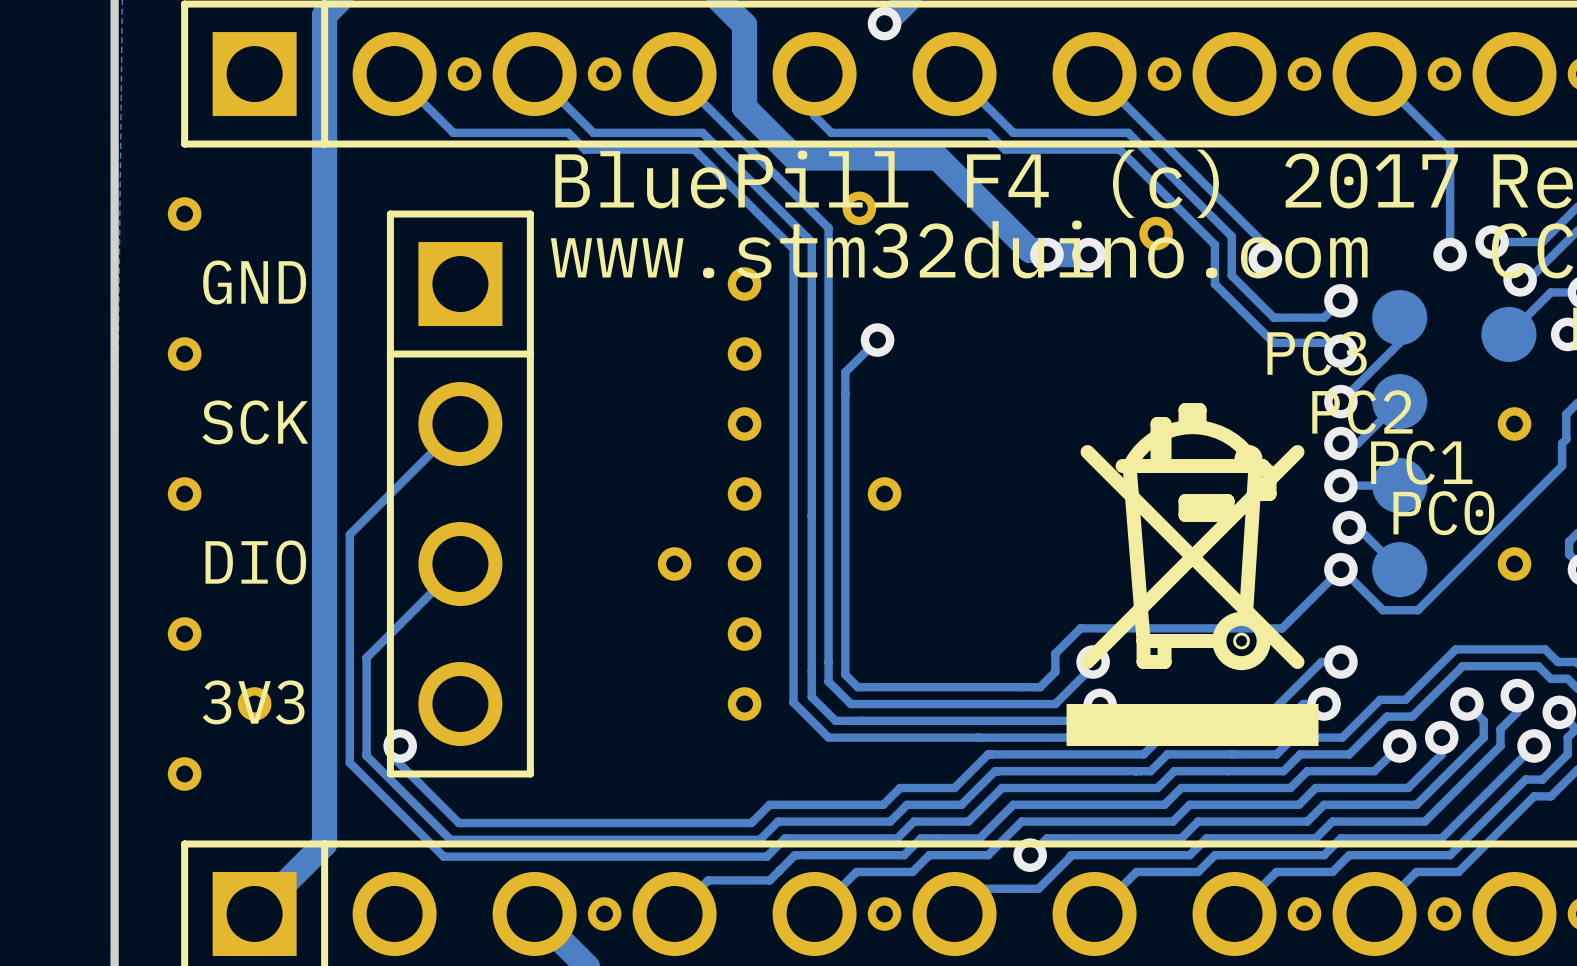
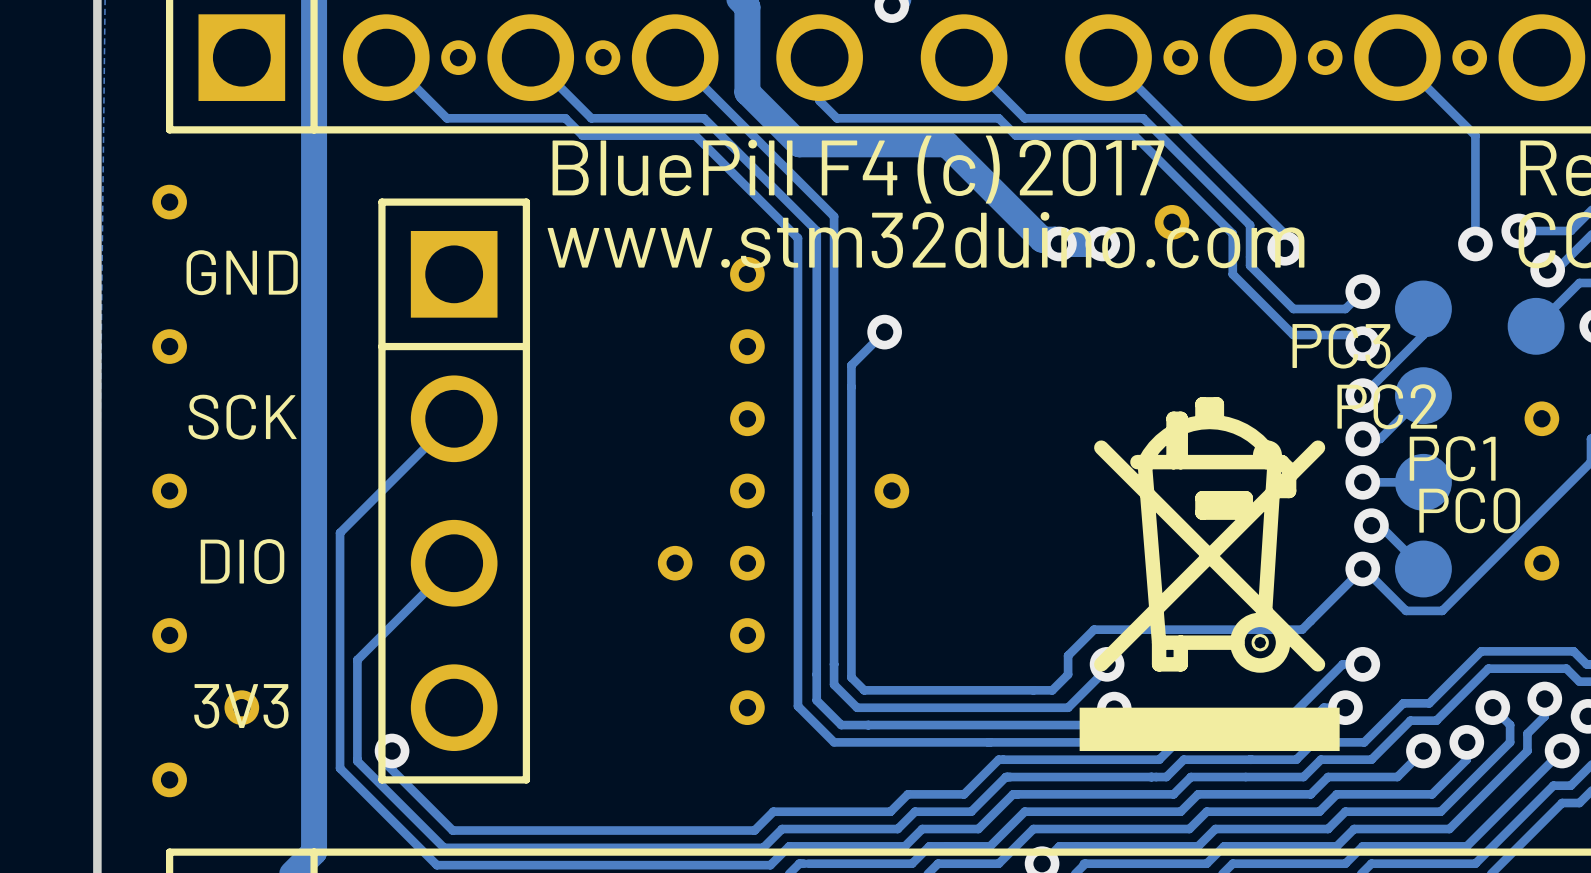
part: (859, 208) -> none

